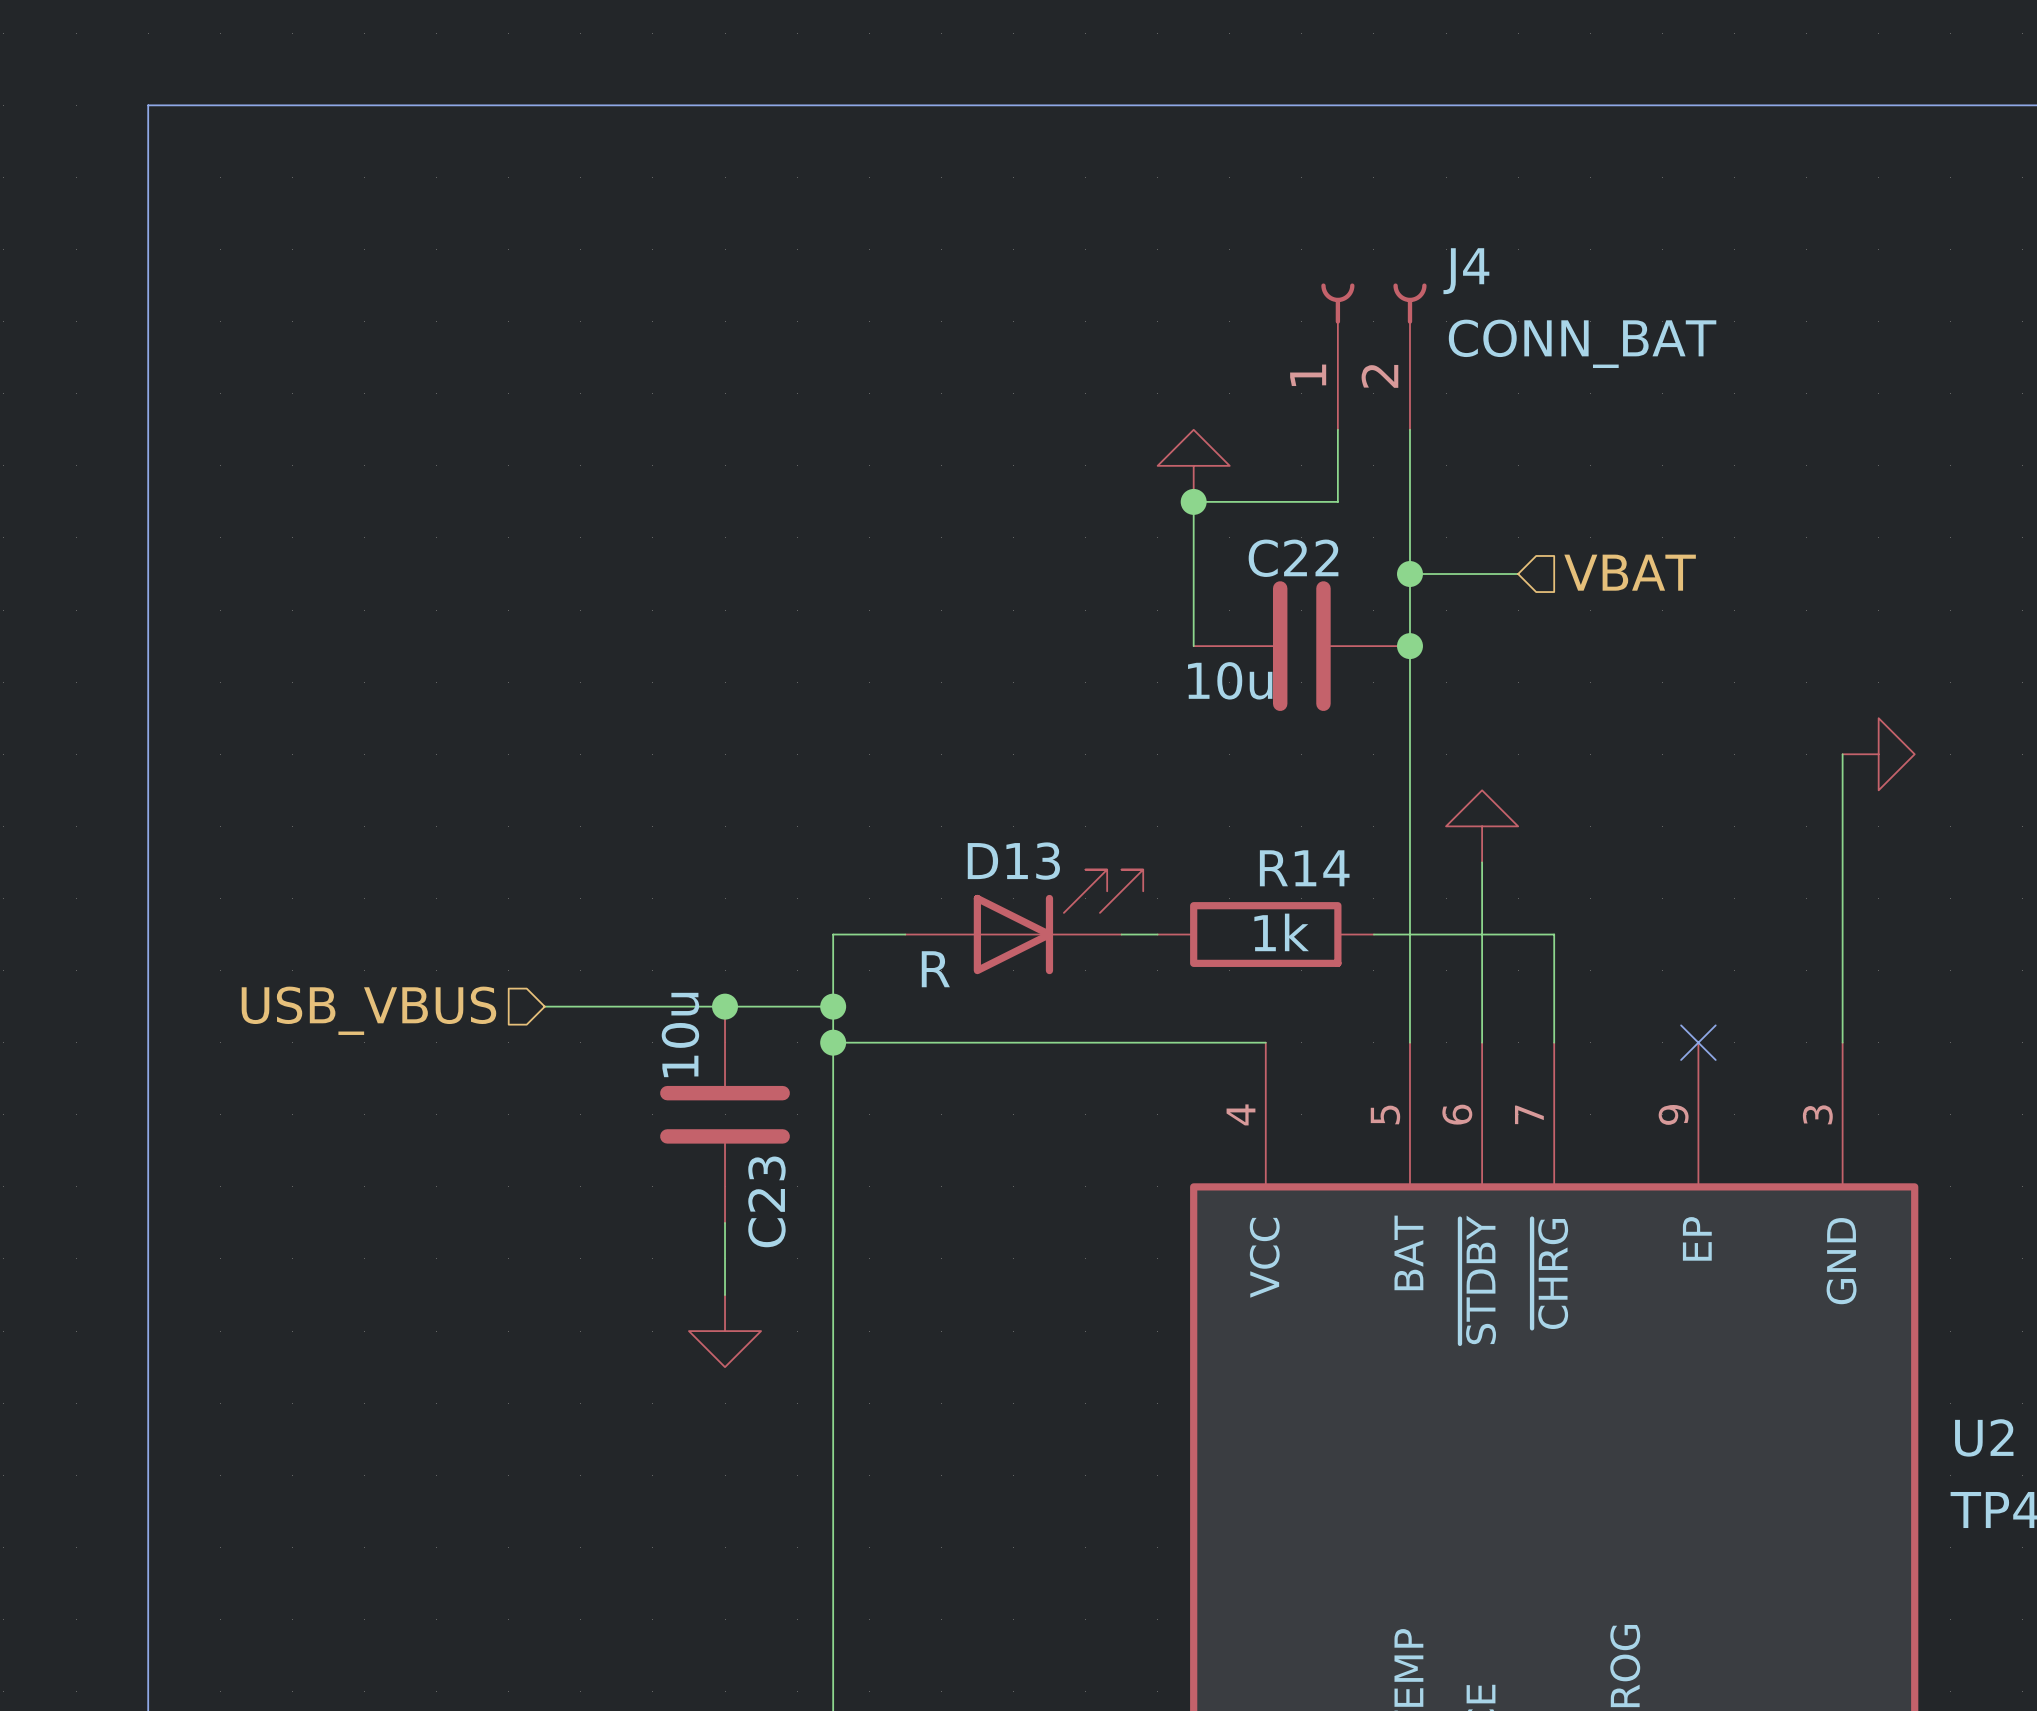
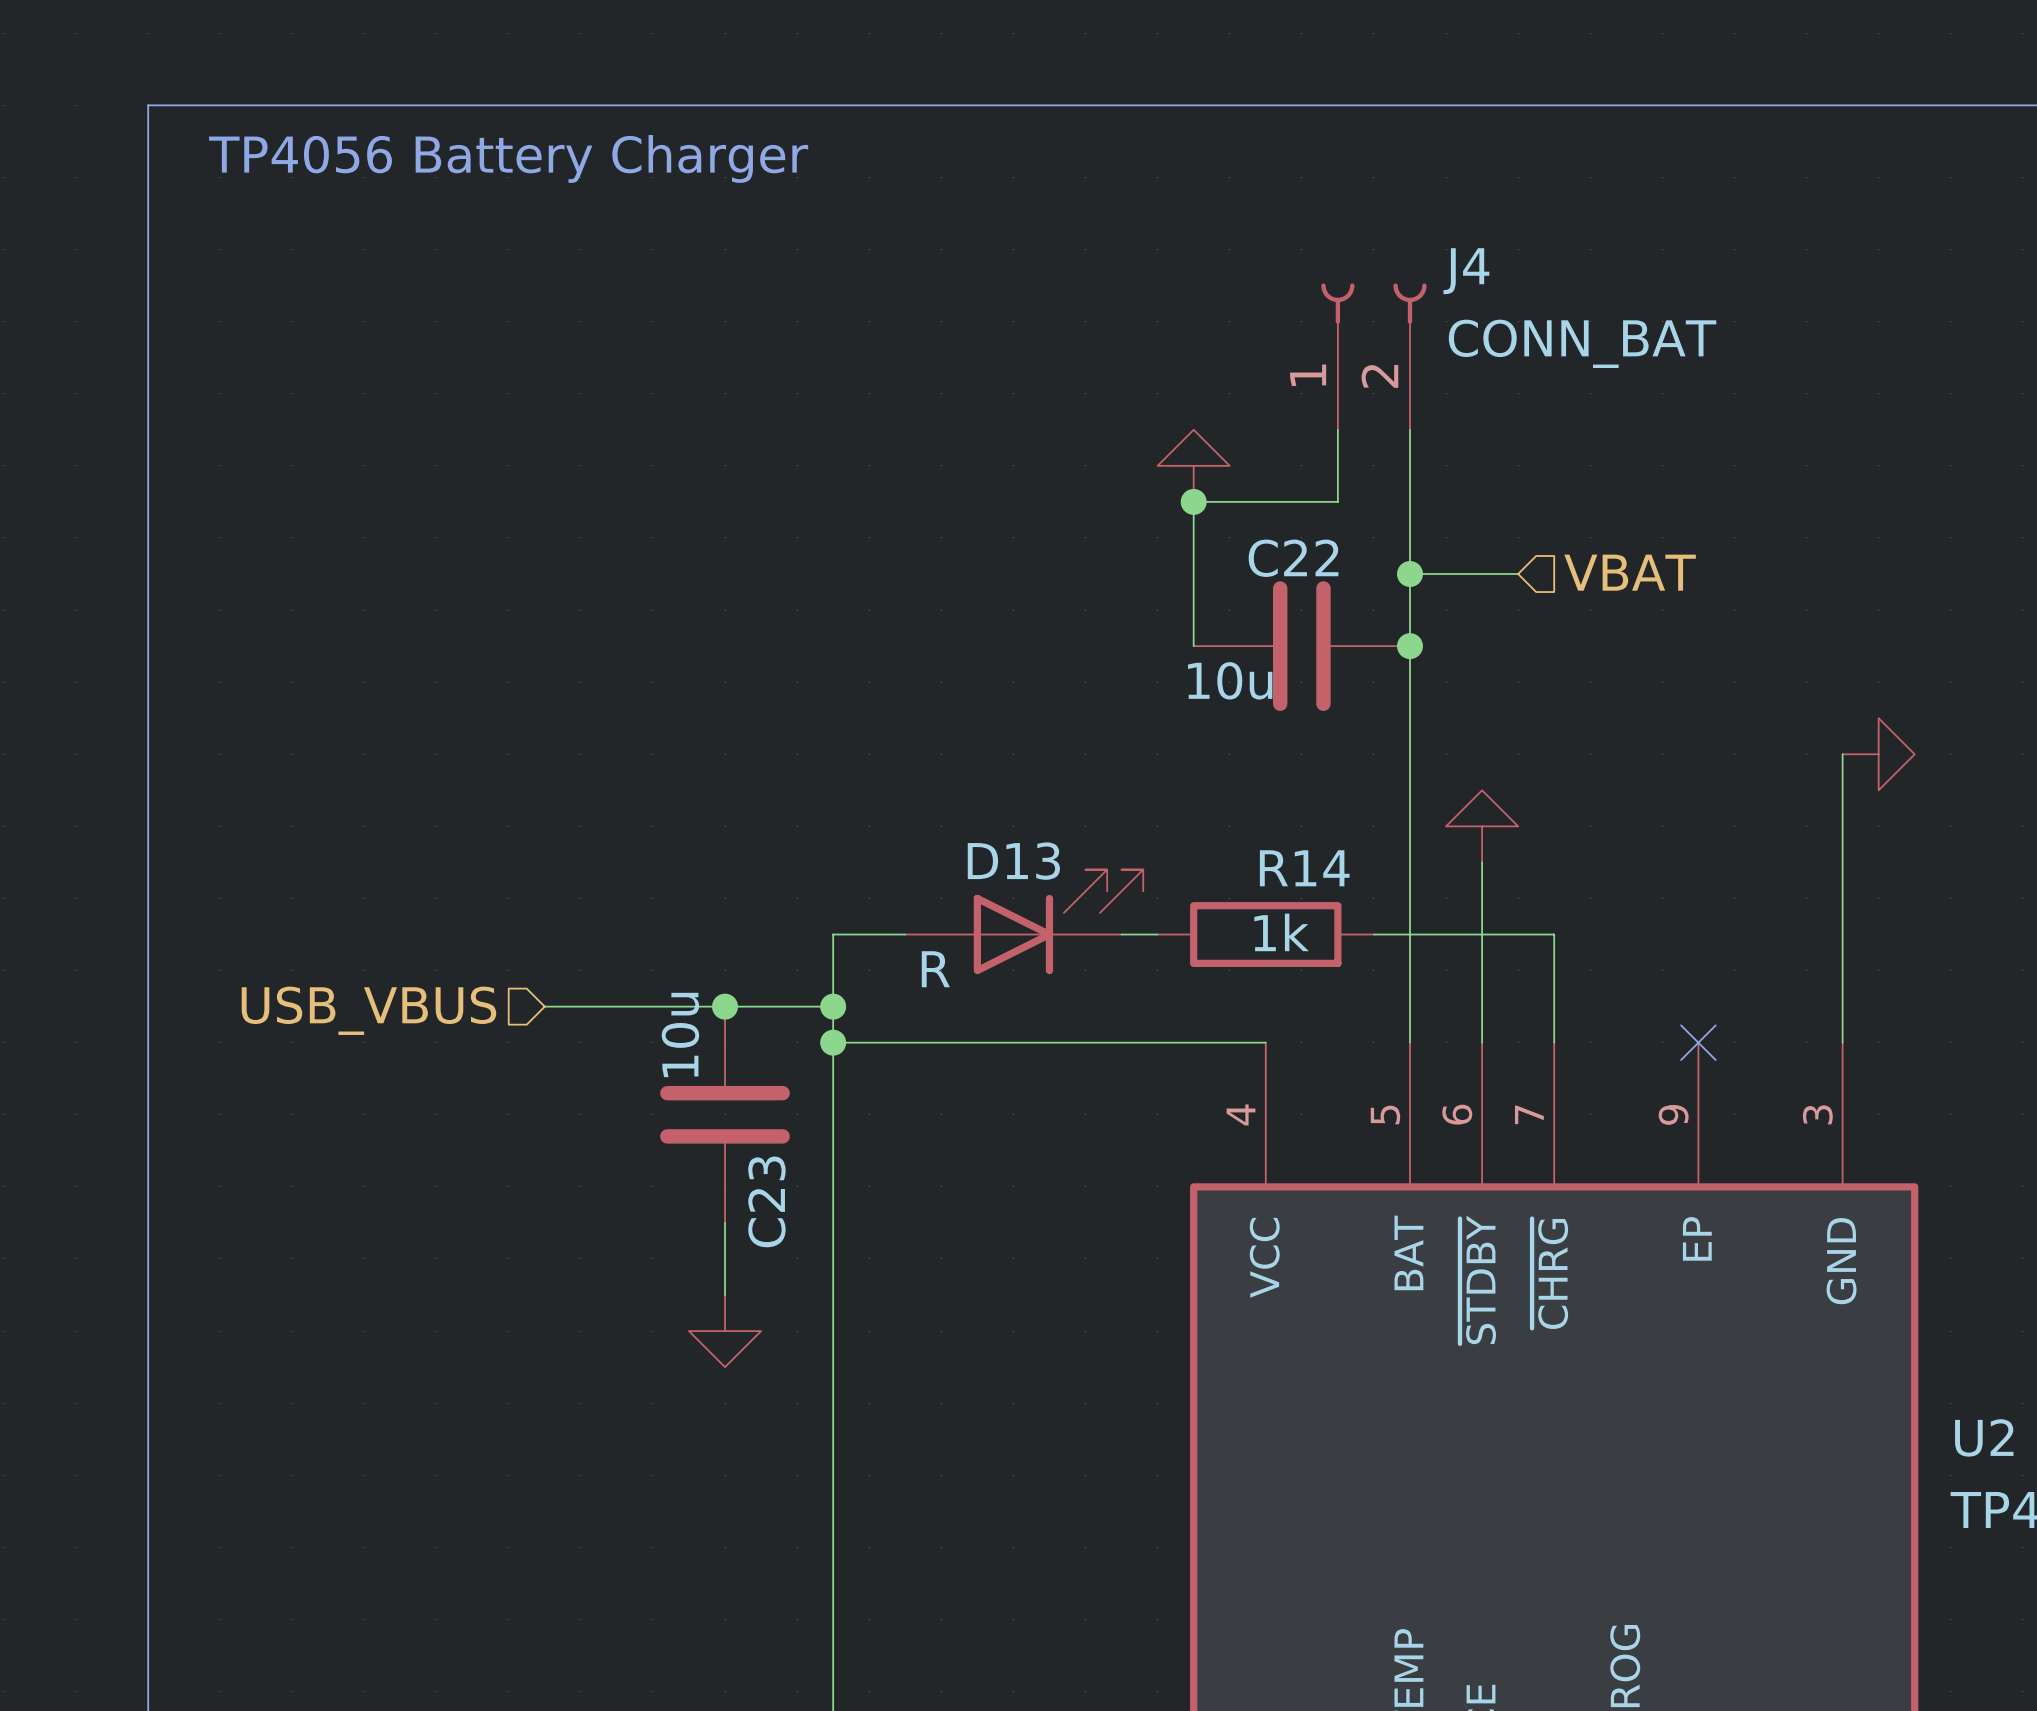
text: none -> TP4056 Battery Charger (508, 158)

